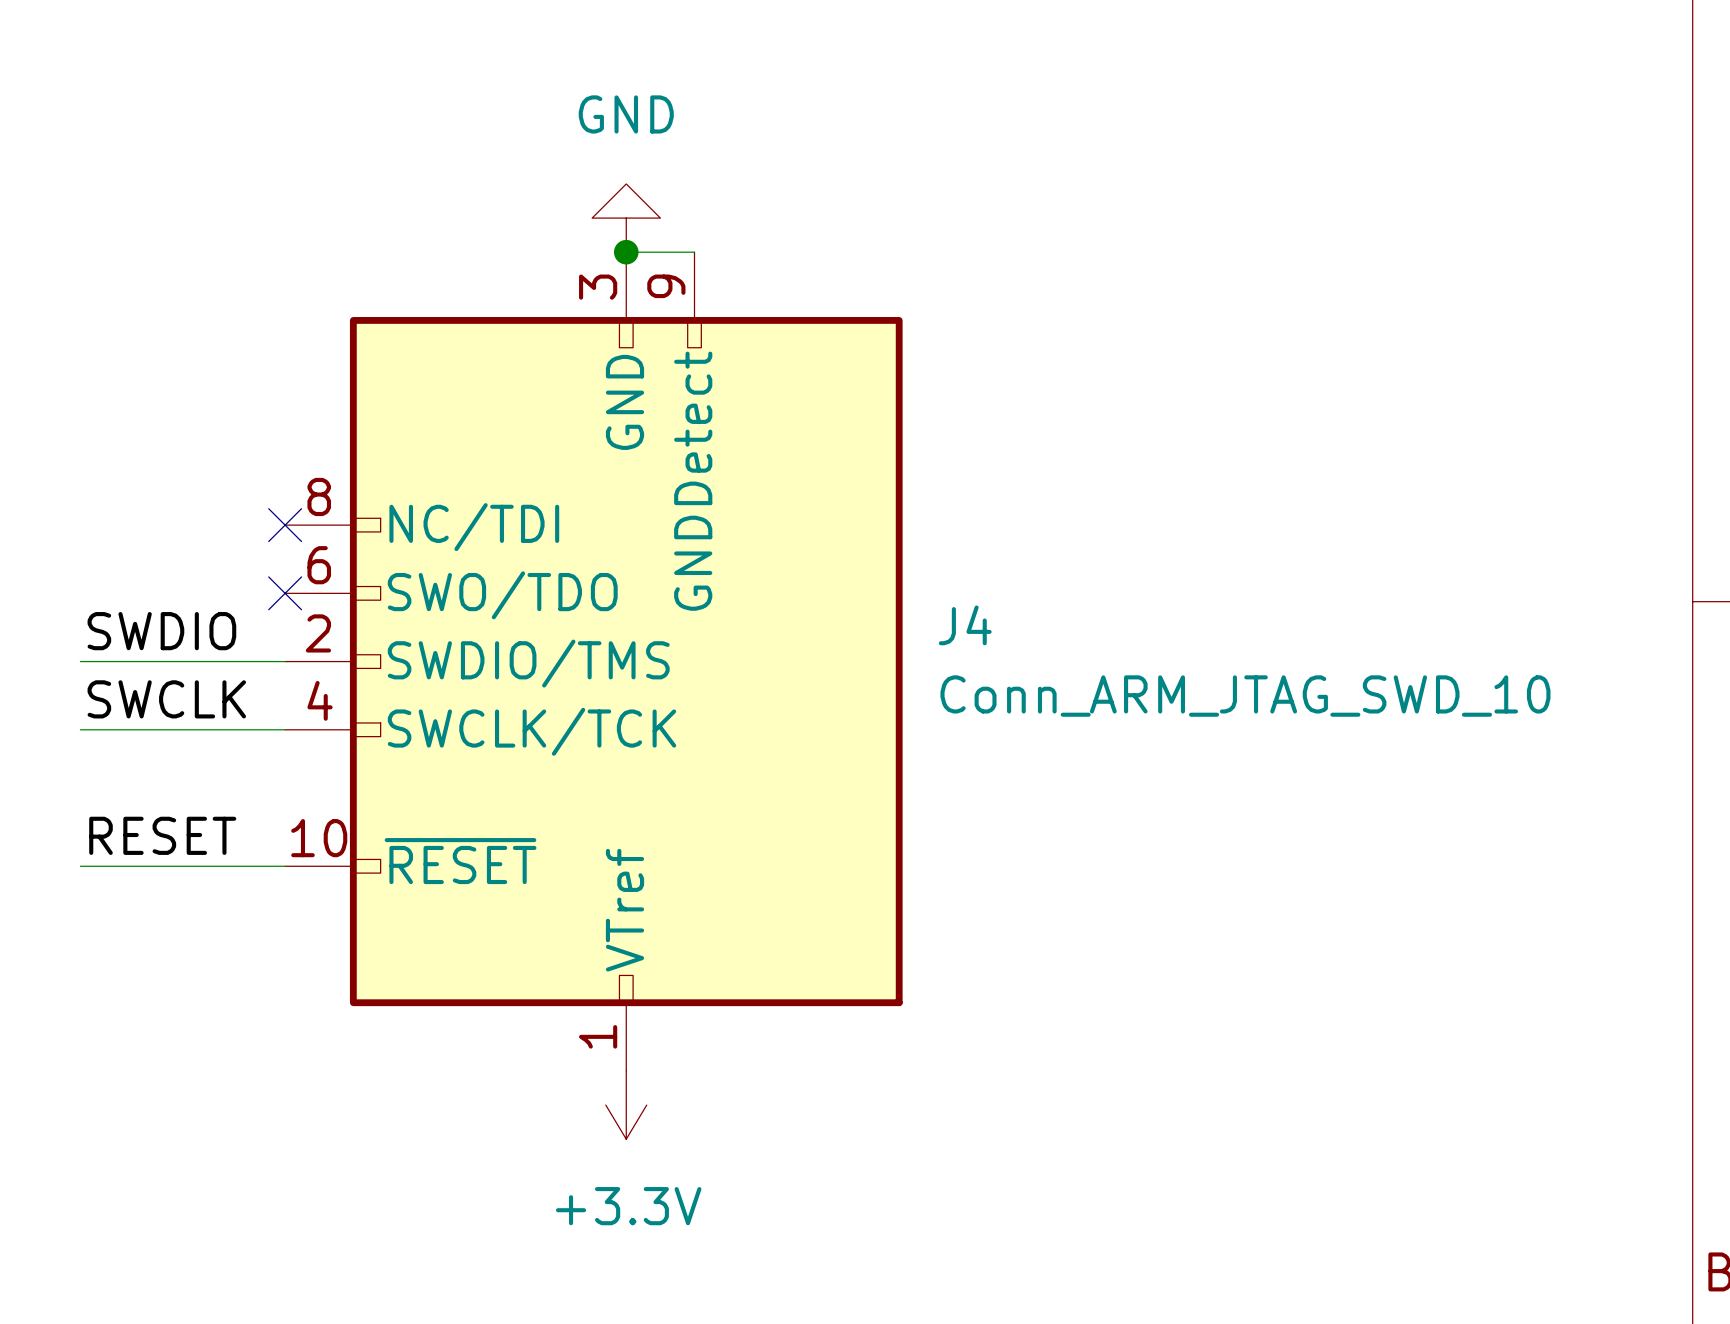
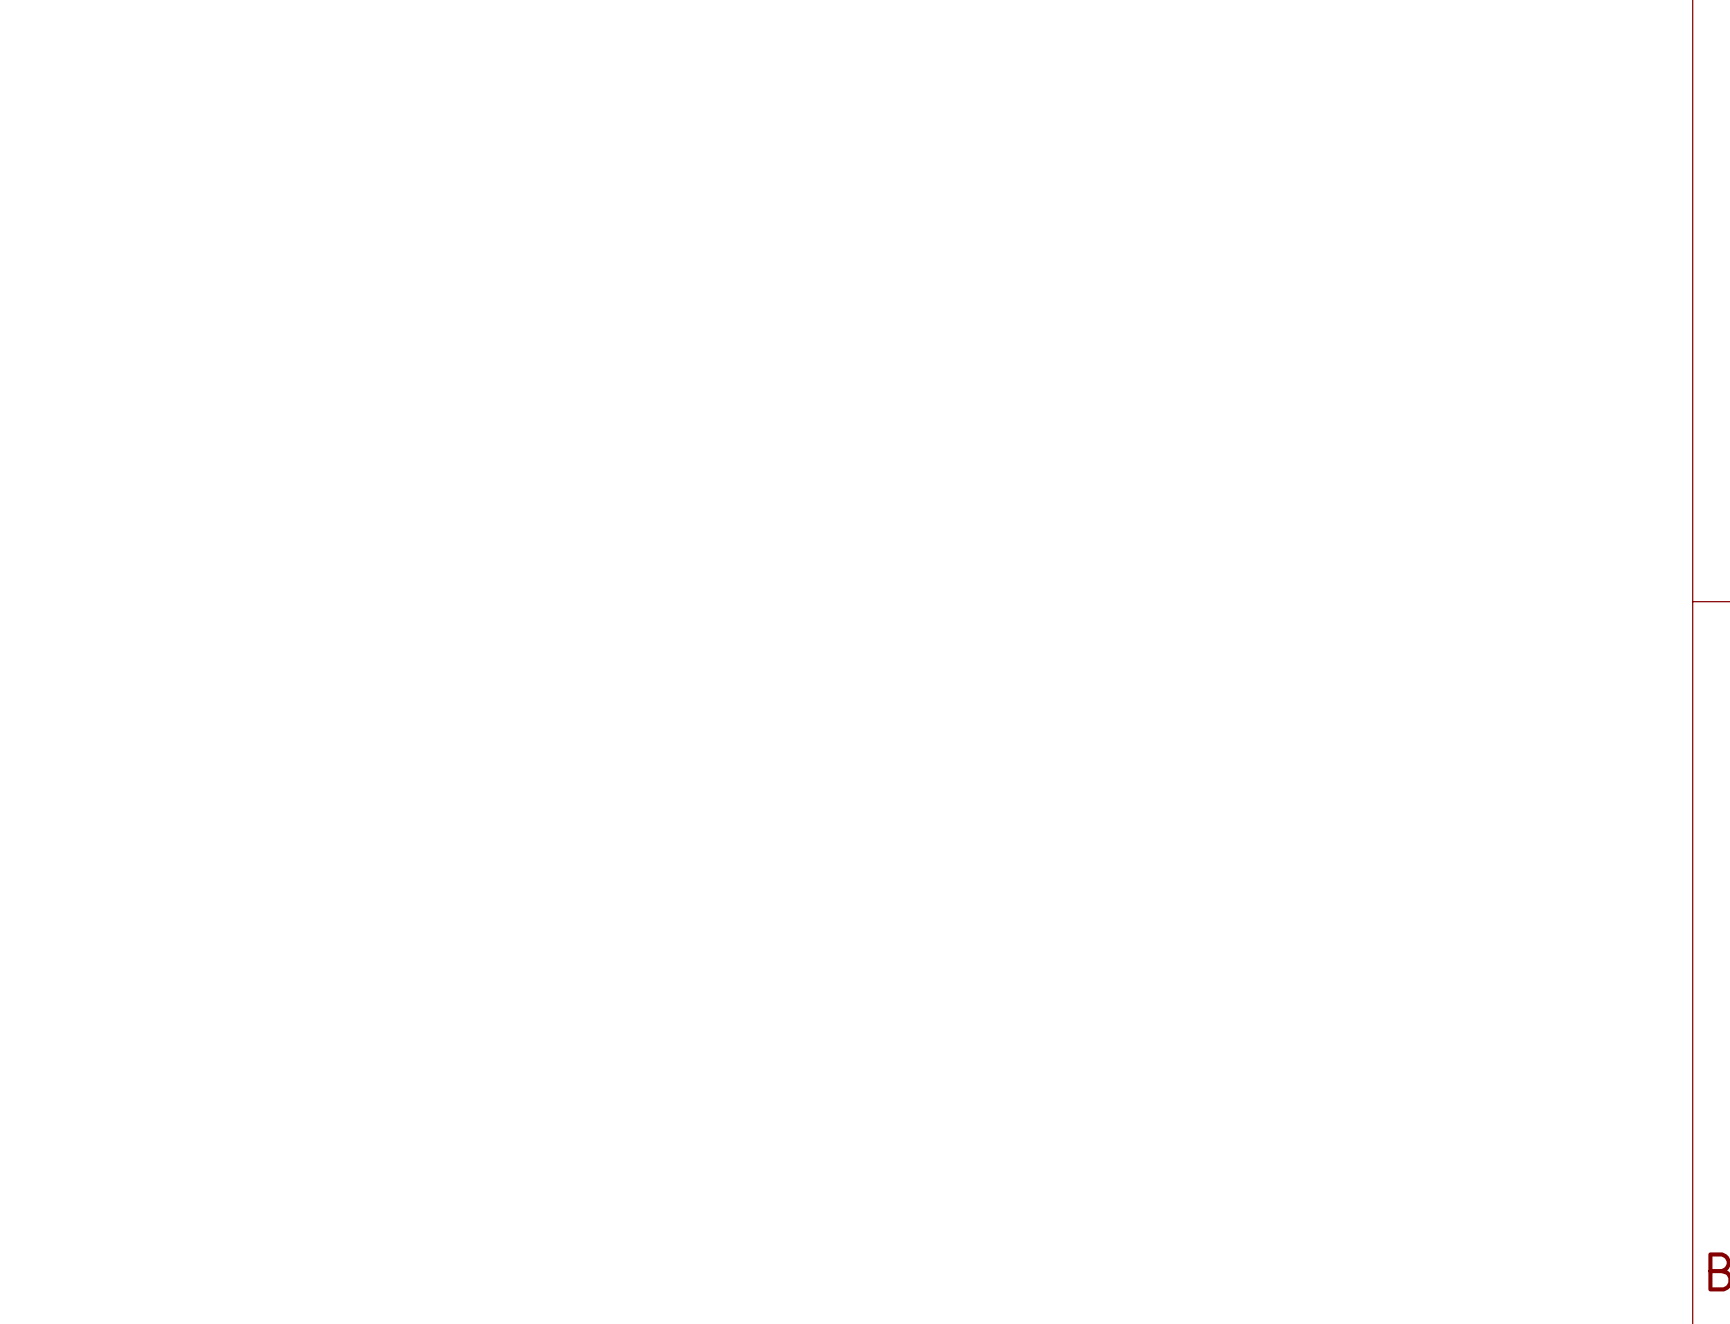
power symbol: GND (626, 218) -> none
wire: (626, 252) (694, 252) -> none
junction: (626, 252) -> none
no-connect mark: (285, 525) -> none
no-connect mark: (285, 593) -> none
label: SWDIO (161, 631) -> none
wire: (80, 661) (285, 661) -> none
J4: Conn_ARM_JTAG_SWD_10 (593, 661) -> none
label: SWCLK (166, 699) -> none
wire: (80, 729) (285, 729) -> none
label: RESET (162, 835) -> none
wire: (80, 866) (285, 866) -> none
power symbol: +3.3V (626, 1105) -> none

